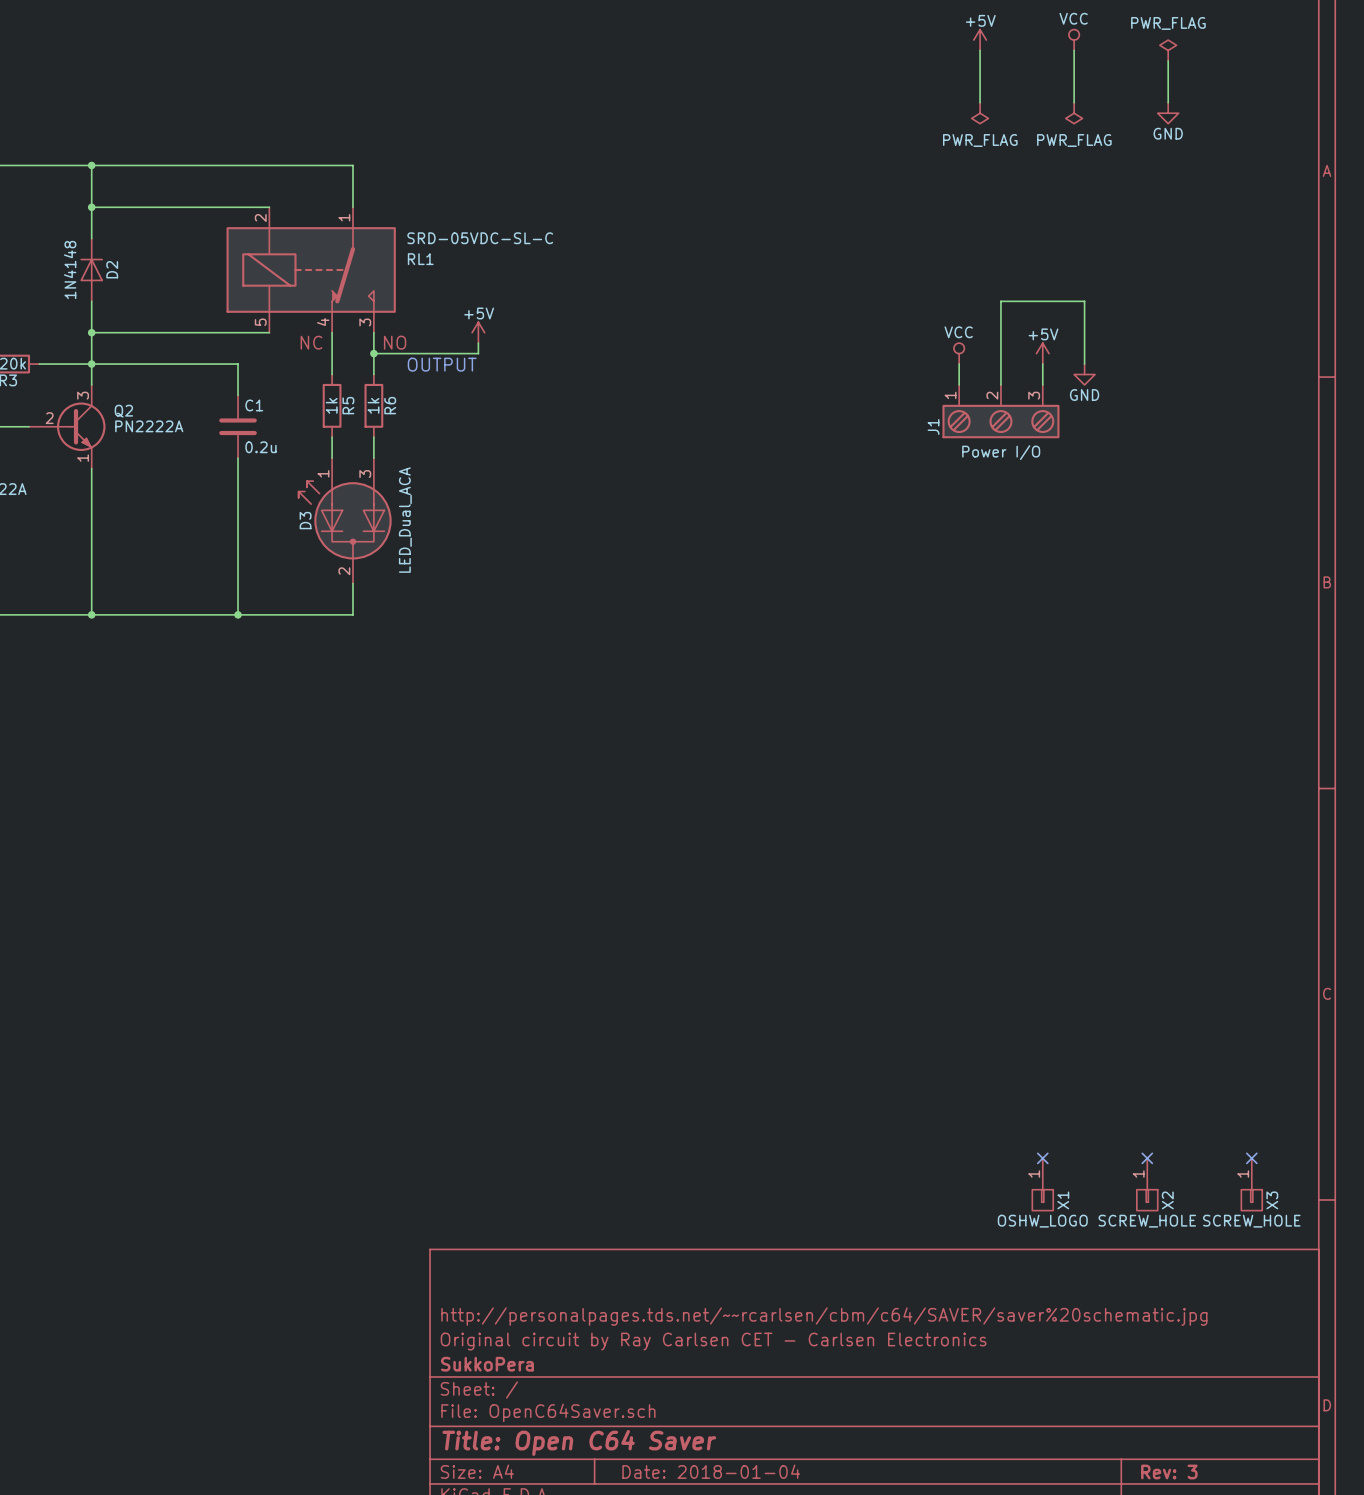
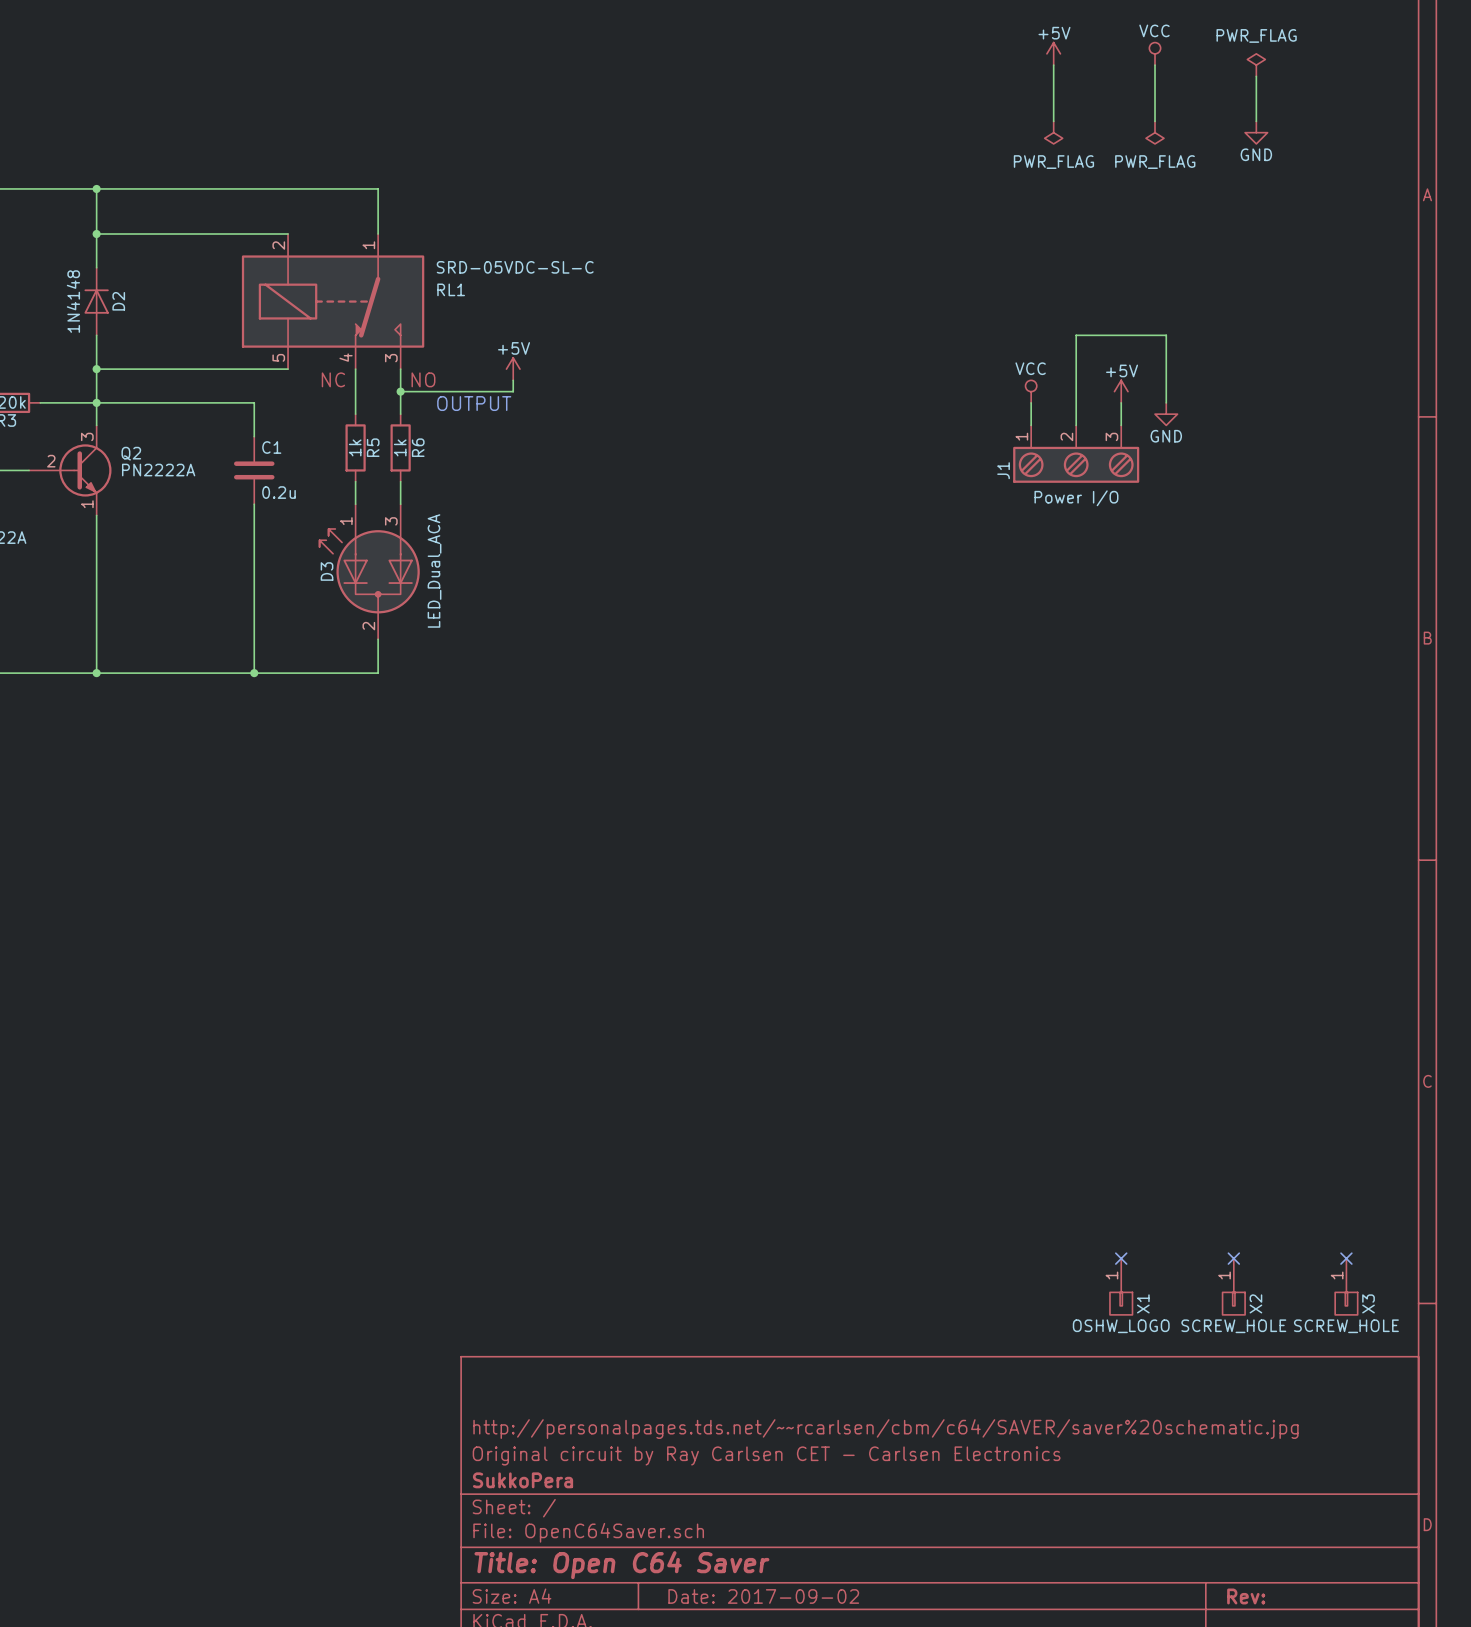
title block: Date: 2018-01-04 (711, 1471) -> Date: 2017-09-02 (763, 1596)
title block: Rev: 3 (1169, 1471) -> Rev: (1246, 1596)

